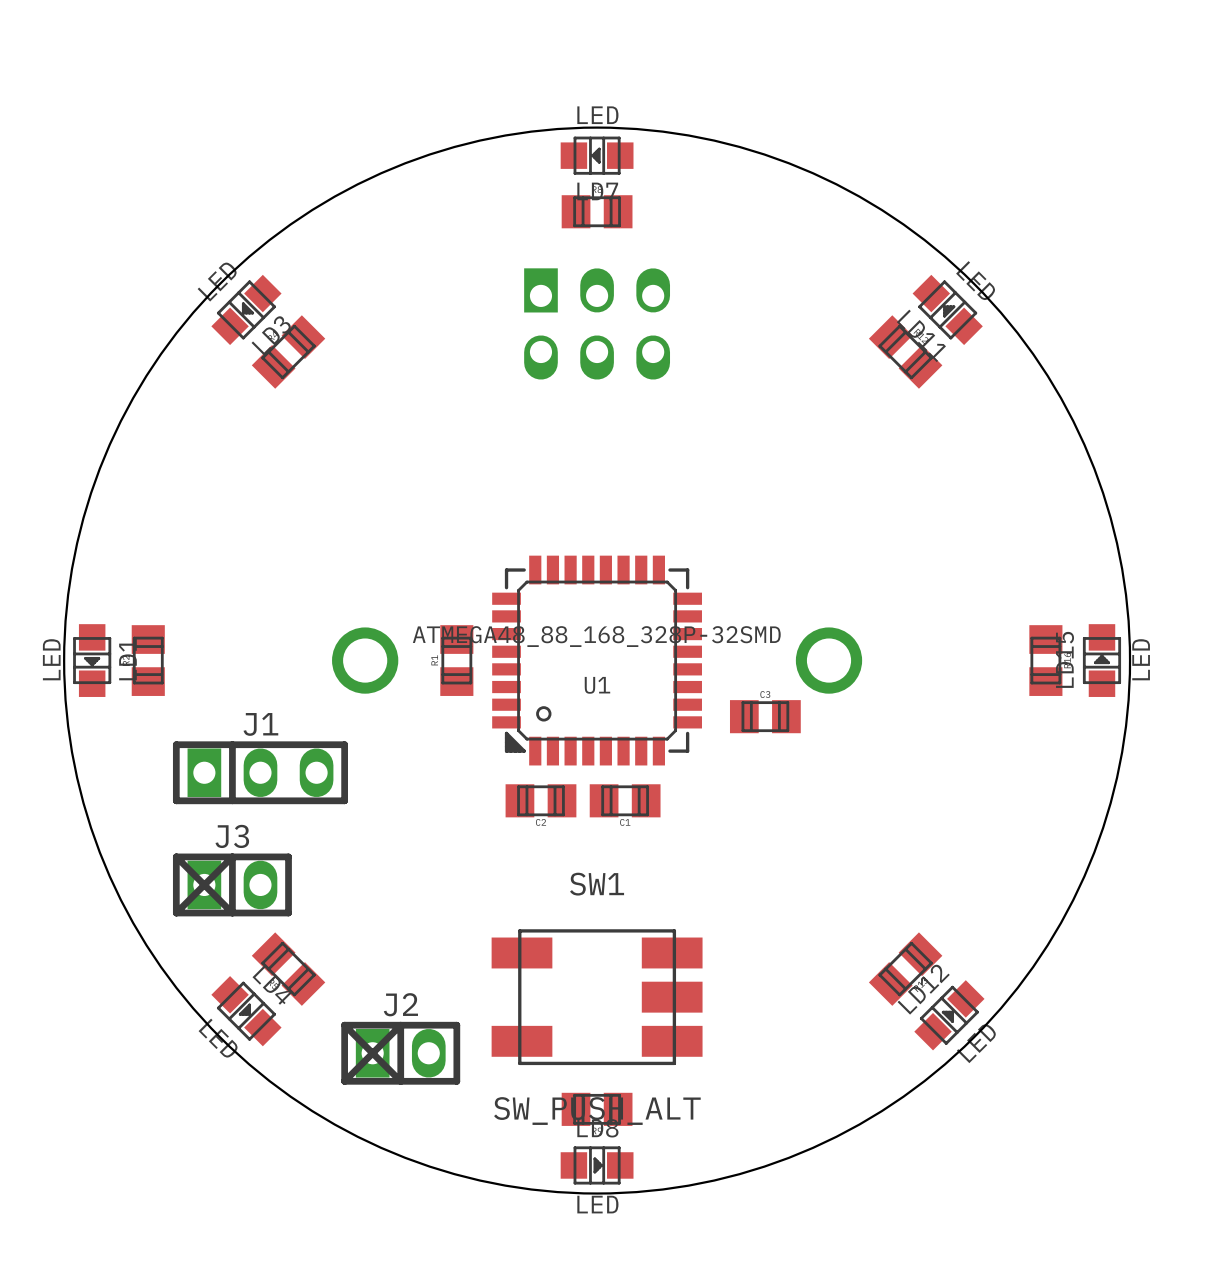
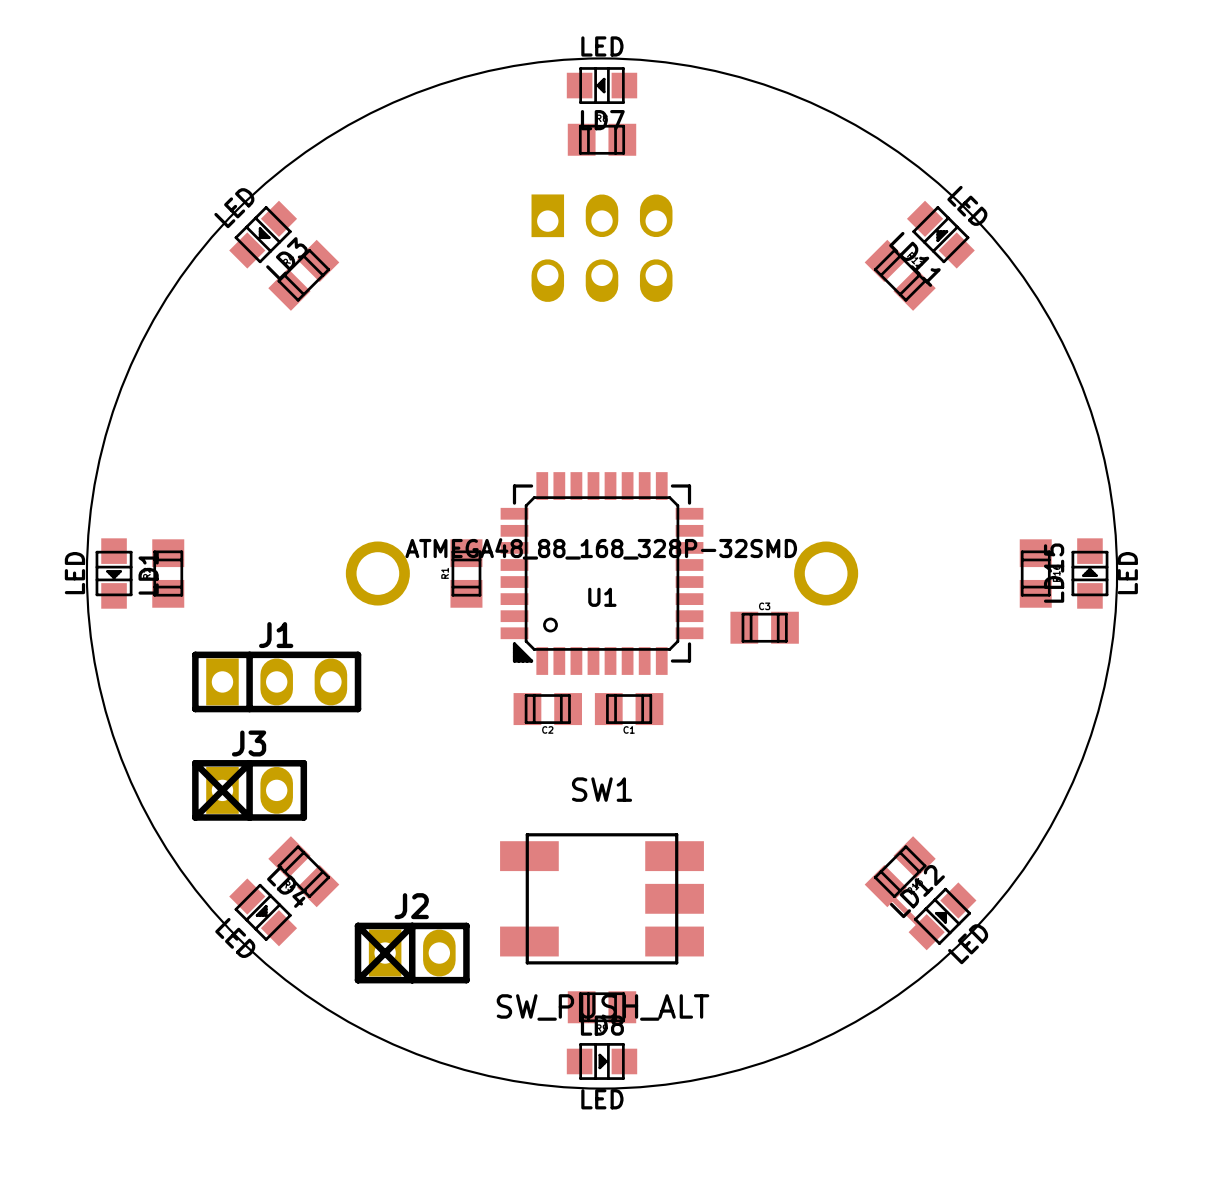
track: none -> (885, 886) (885, 891) (926, 932)

